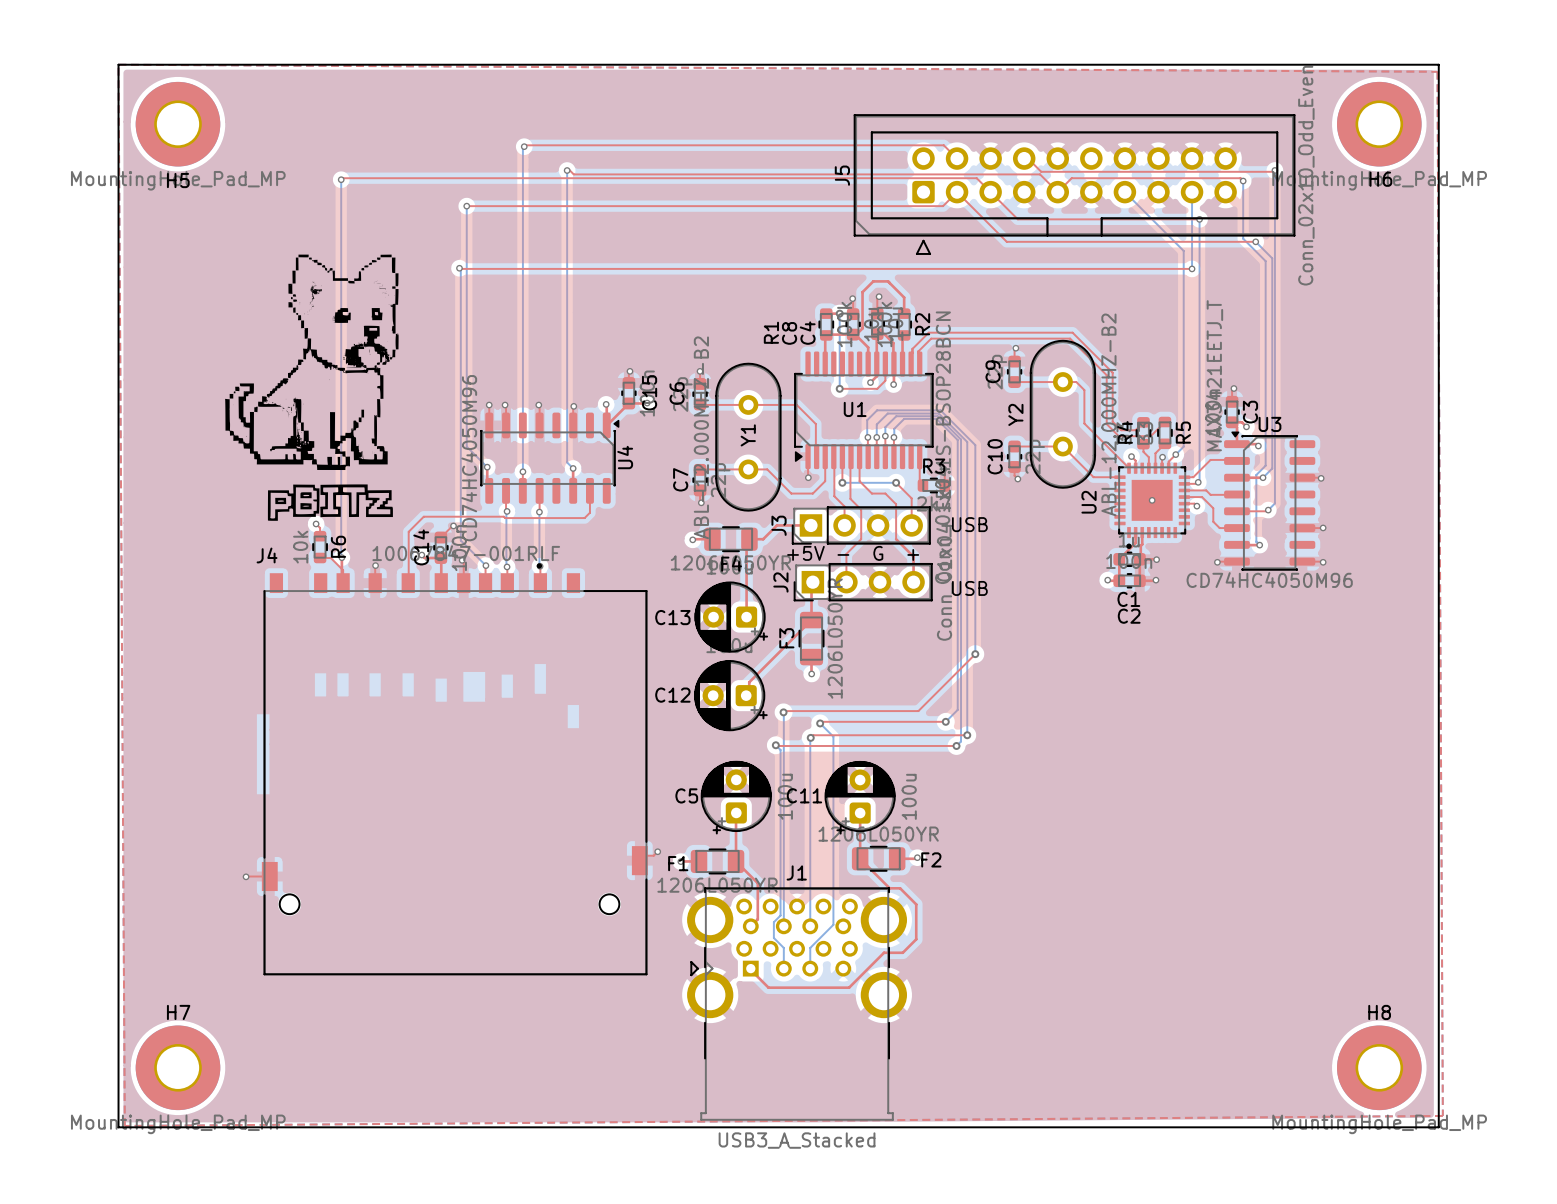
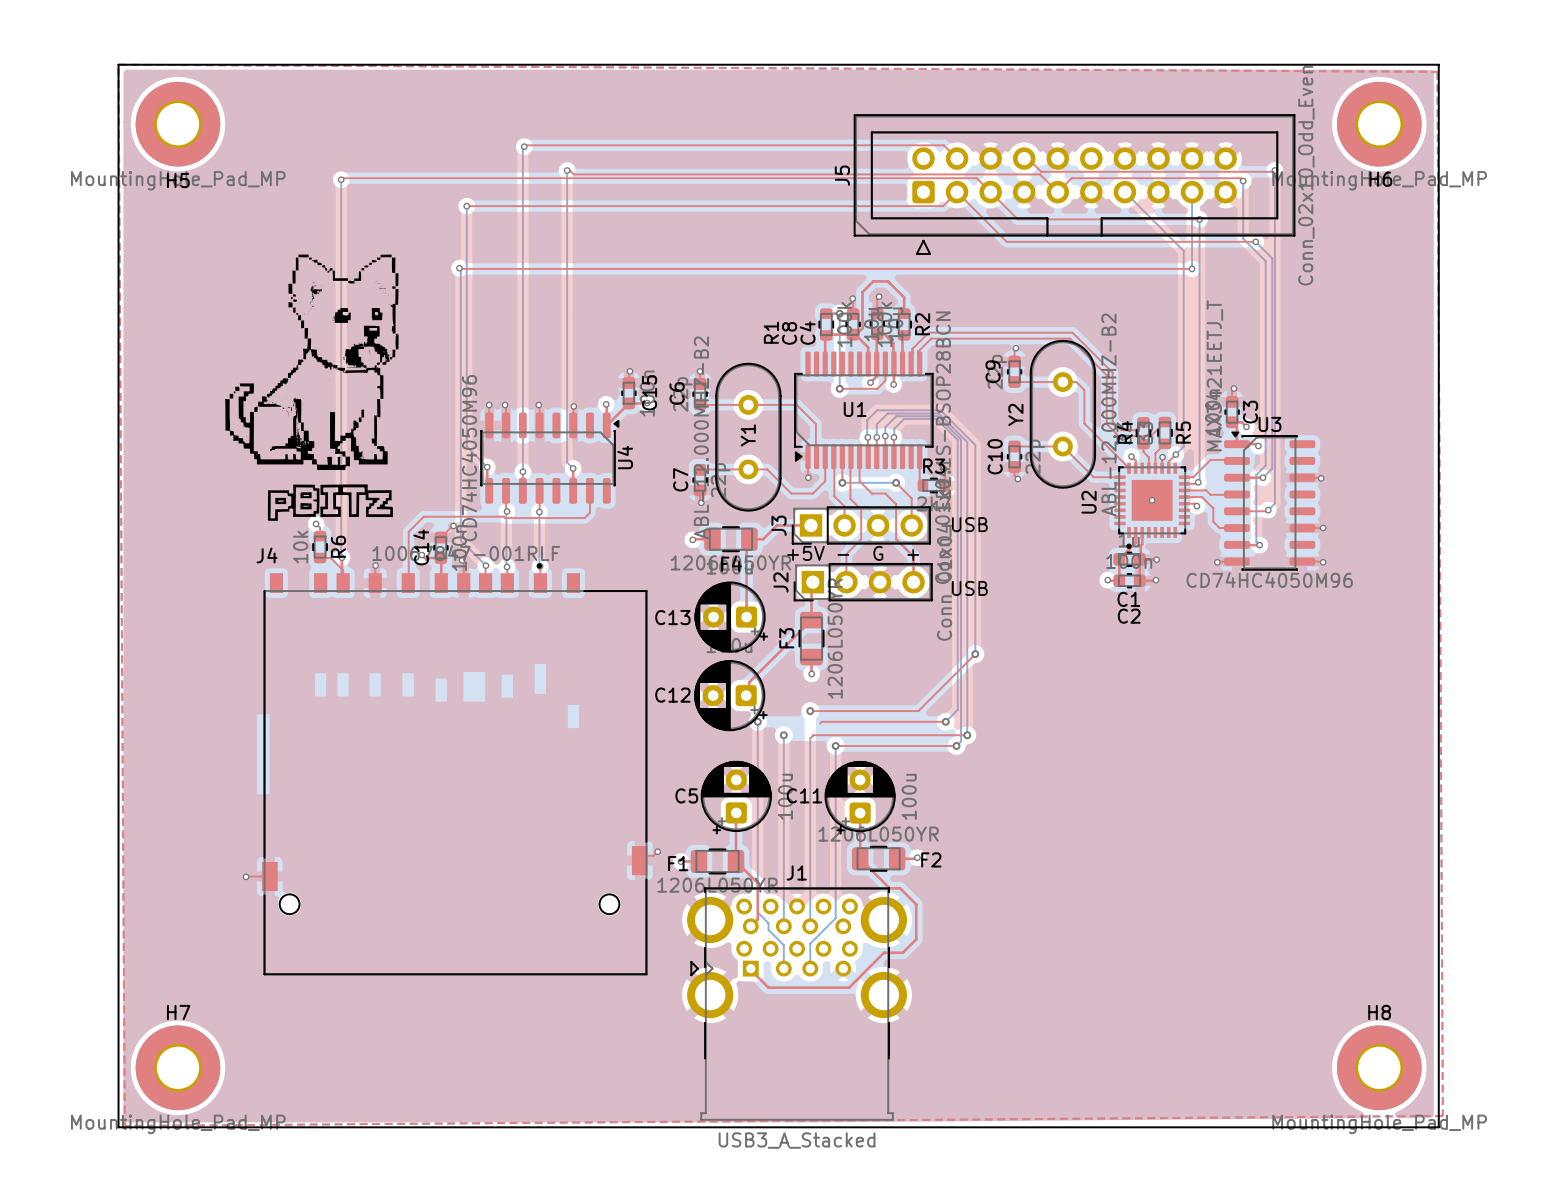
top track: (810, 711) (783, 712) -> none
via: none -> (810, 711)
bottom track: (783, 712) (783, 735) -> none
via: (783, 712) -> none
via: none -> (757, 721)
bottom track: (820, 723) (833, 736) (833, 924) (810, 947) -> (835, 745) (835, 918) (810, 943) (810, 947)
via: (820, 723) -> none
via: none -> (783, 735)
via: (810, 737) -> none
top track: (775, 745) (835, 745) -> none
bottom track: (775, 745) (780, 749) (780, 915) (773, 922) (773, 937) (783, 947) -> (757, 721) (757, 912) (768, 923) (768, 929) (783, 945) (783, 947)
via: (775, 745) -> none
via: none -> (835, 745)

